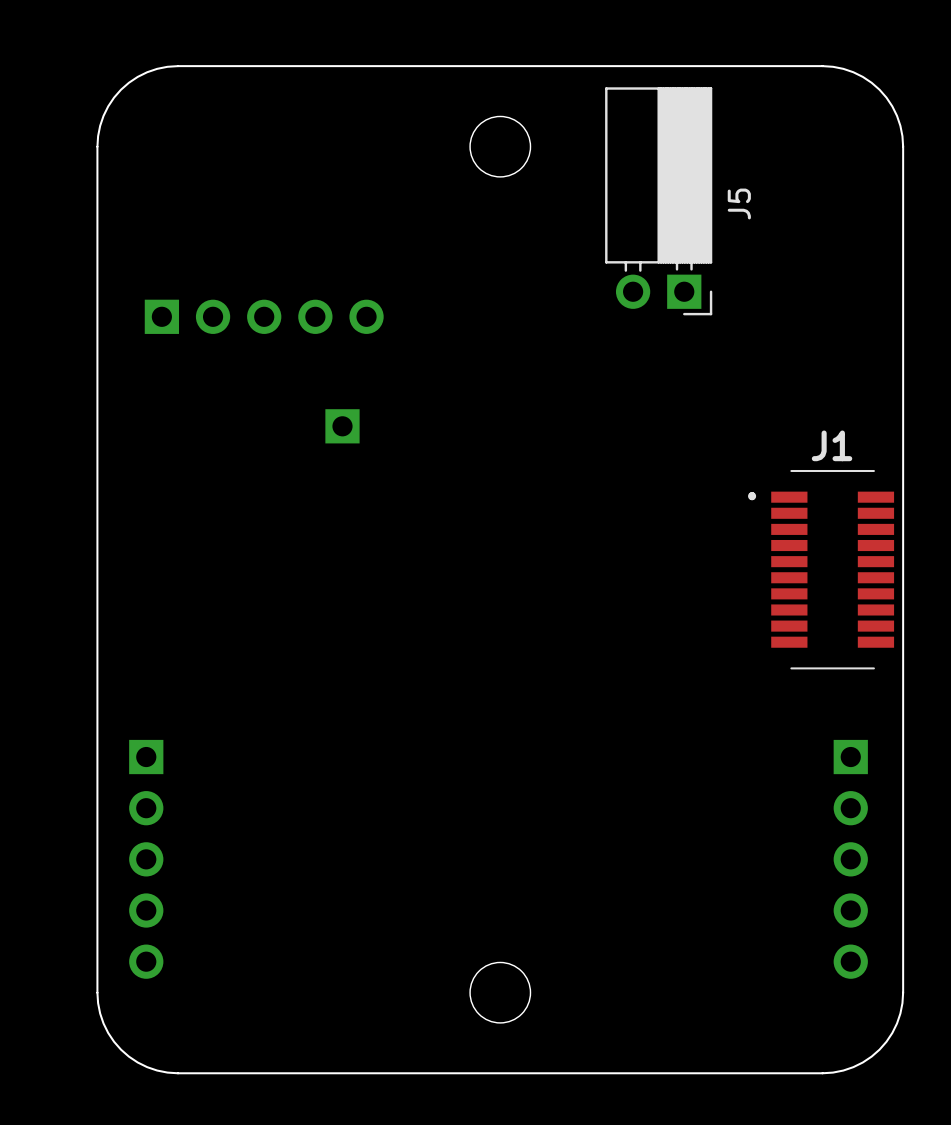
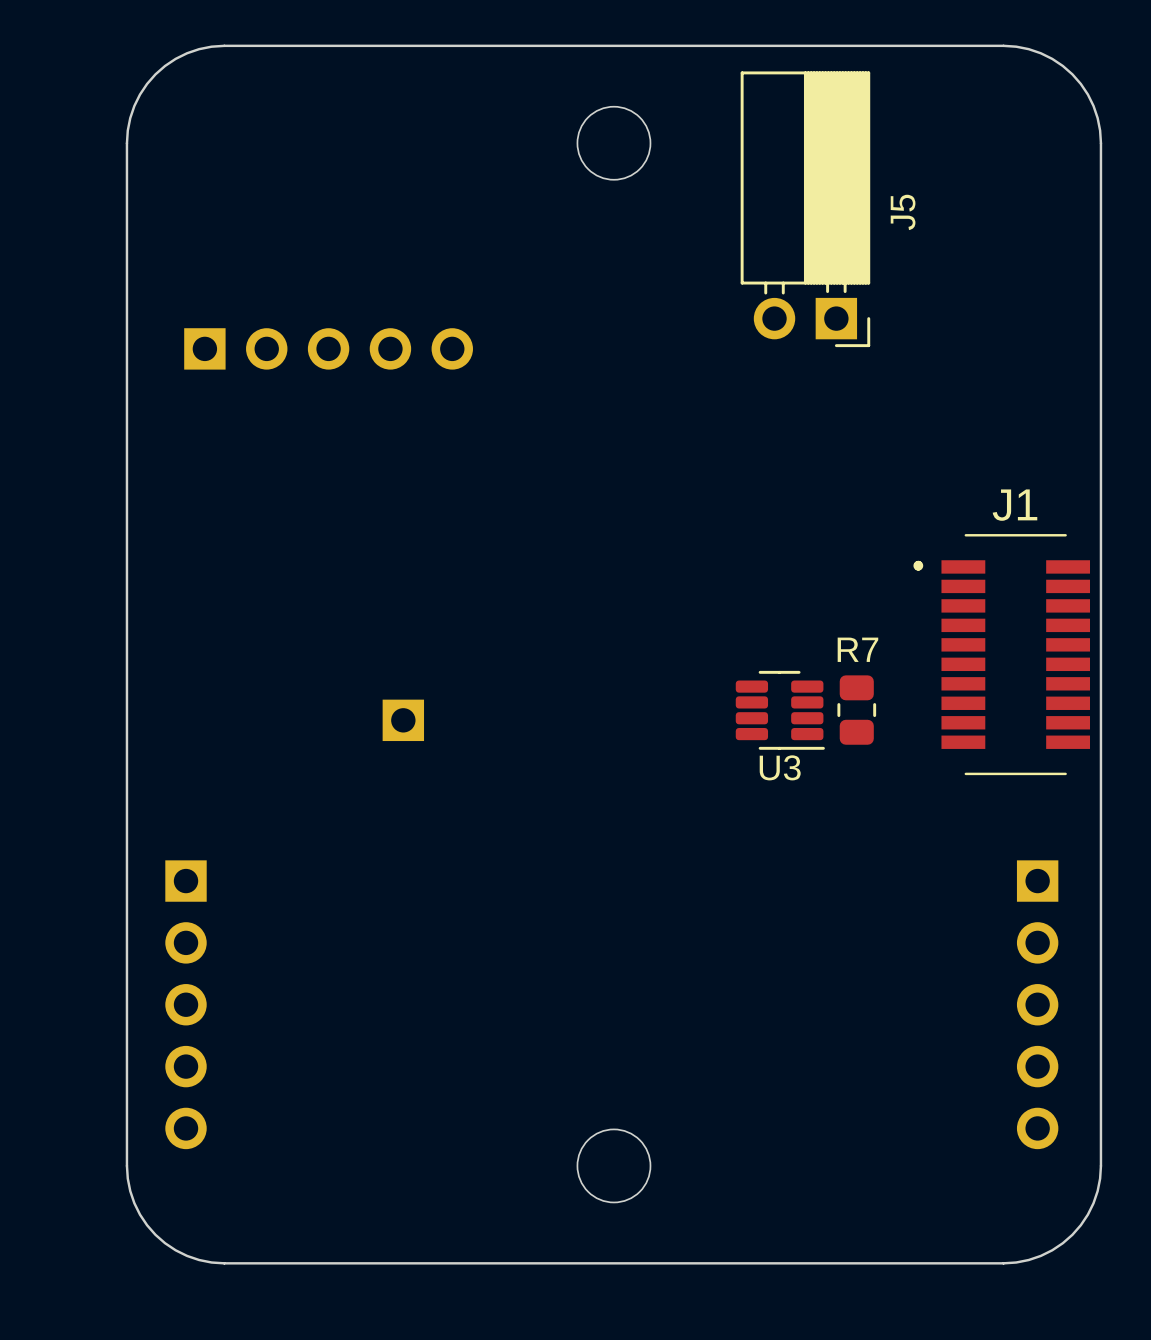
part position: (342, 426) -> (403, 720)
U3: none -> (780, 710)
R7: none -> (856, 710)

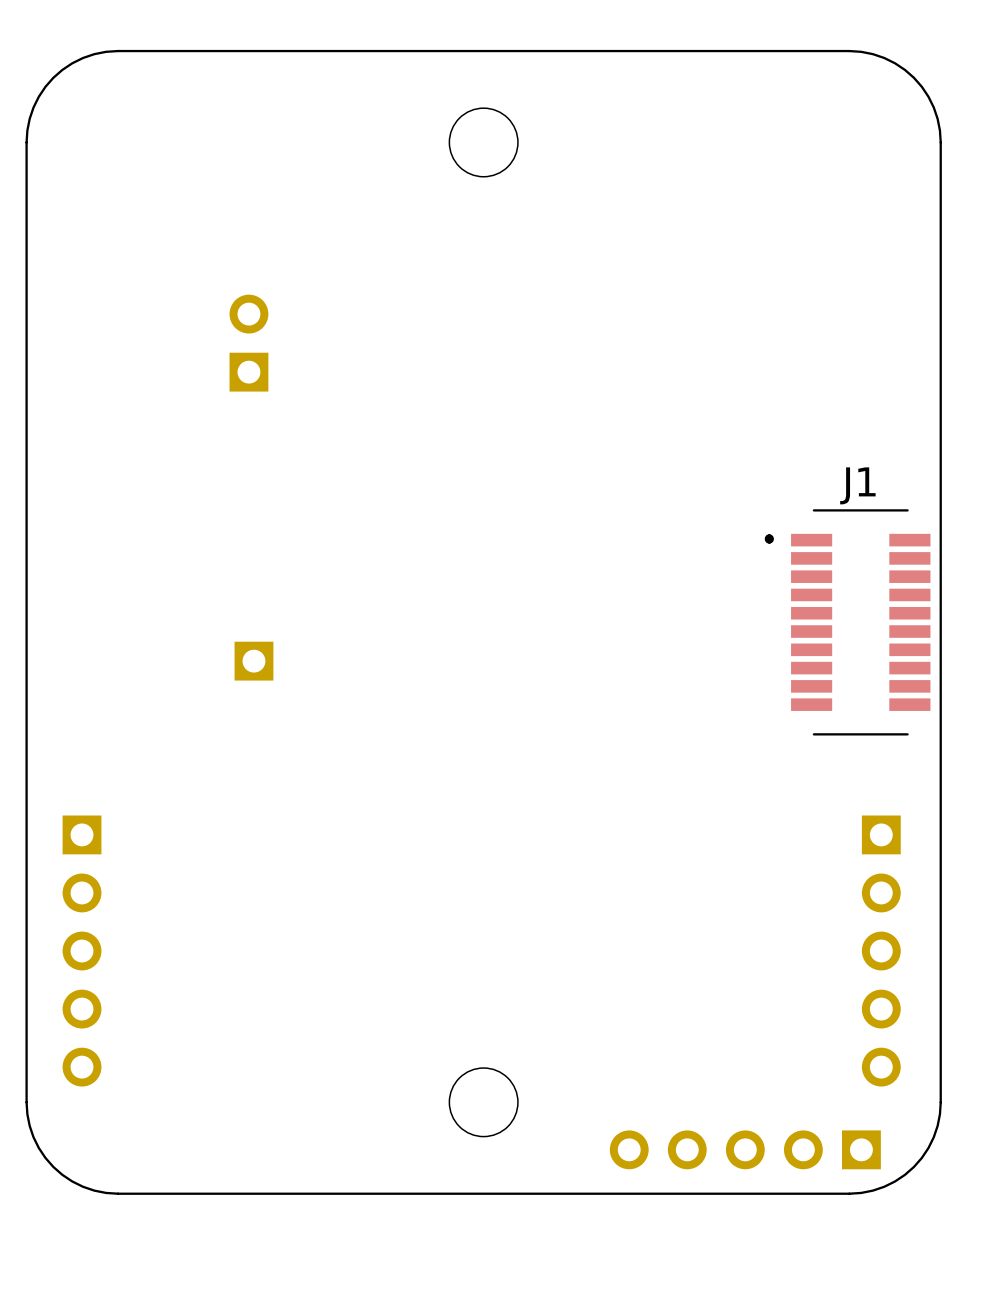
J5 side: top (805, 209) -> bottom (248, 343)
part: (328, 348) -> none
U3: (780, 710) -> none
R7: (856, 710) -> none
part position: (403, 720) -> (253, 661)
part: none -> (745, 1149)

